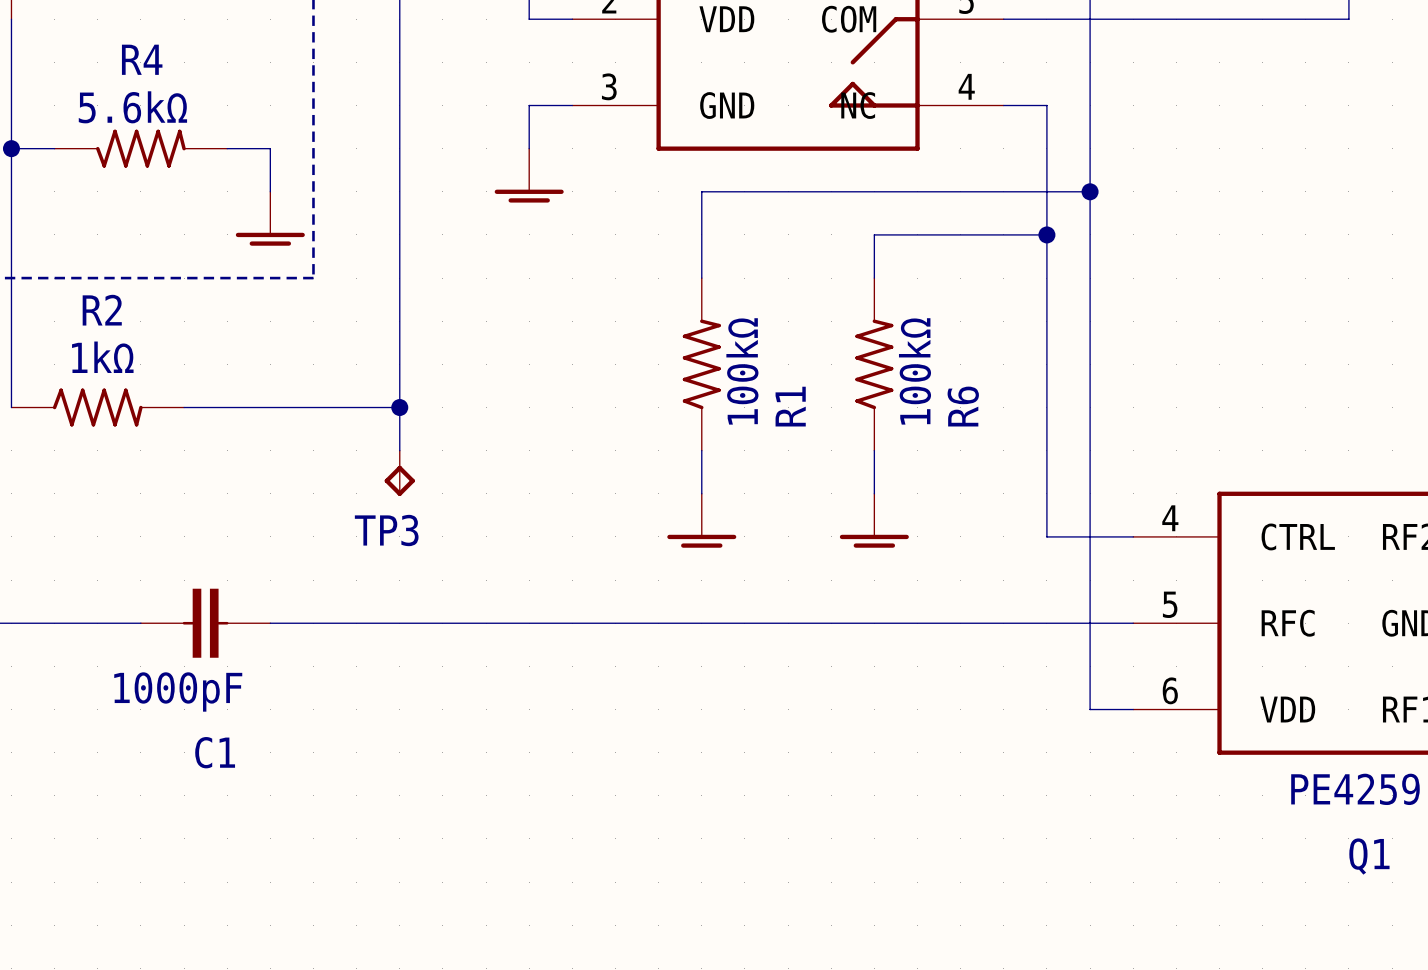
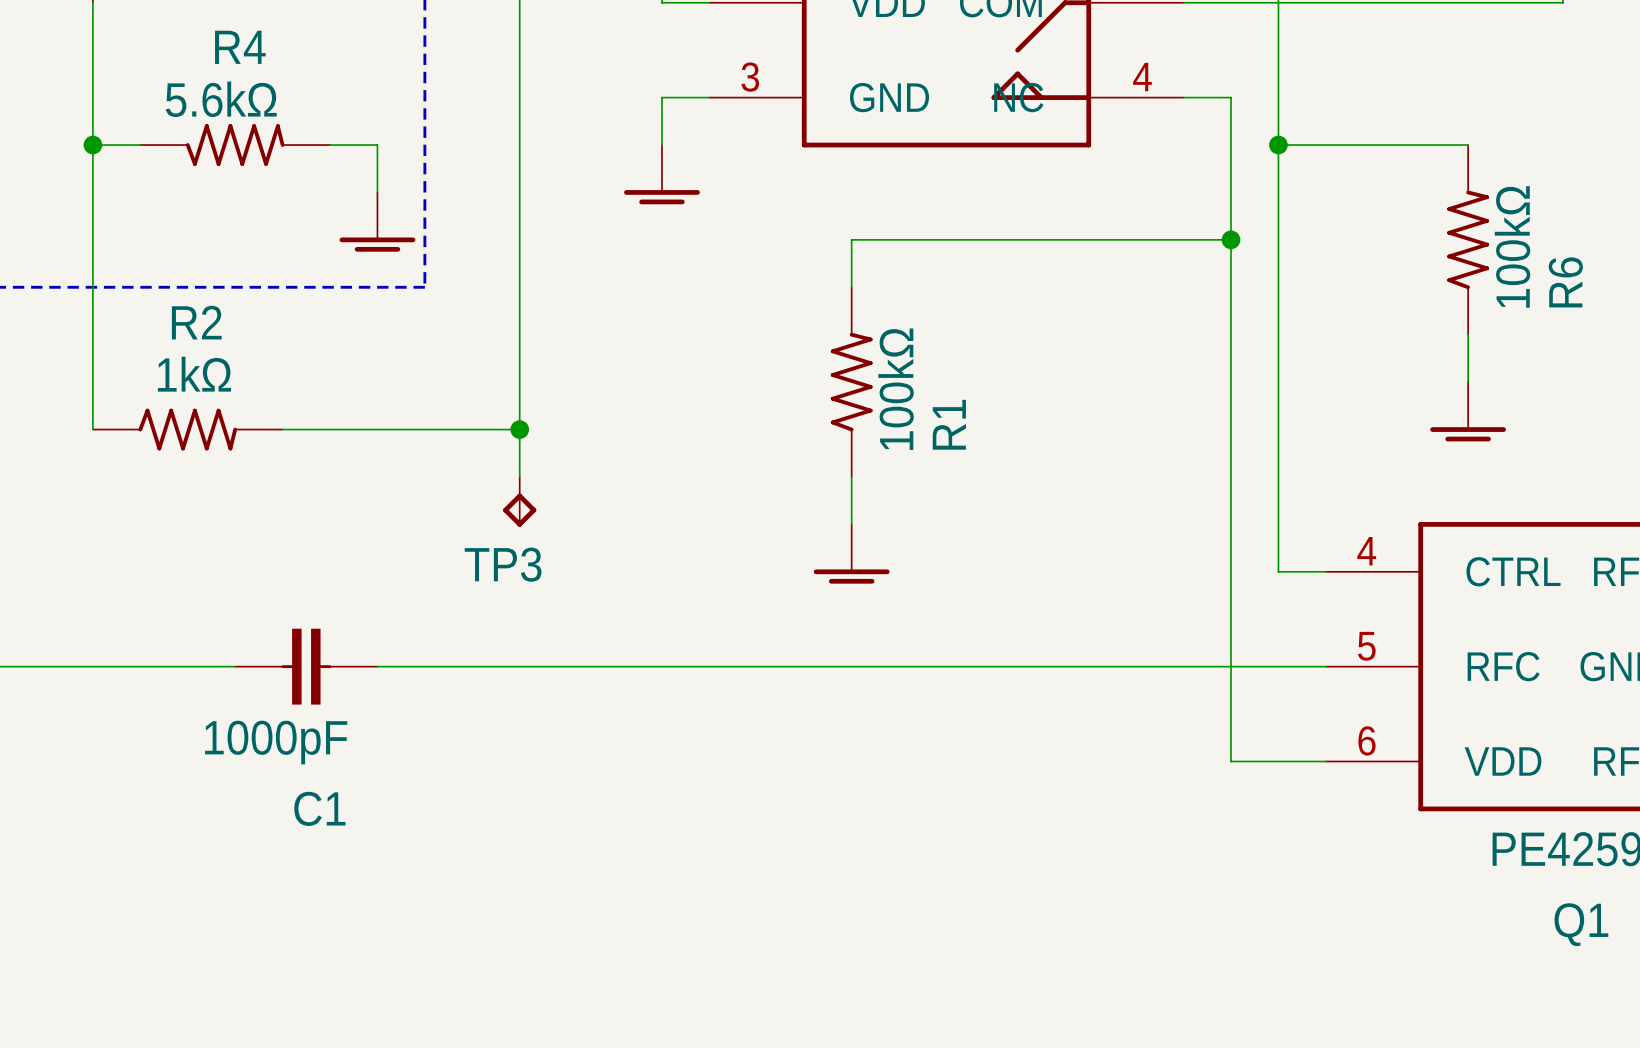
wire: none -> (1278, 145) (1468, 145)
wire: (1090, 191) (701, 191) (701, 234) -> none
junction position: (1090, 191) -> (1278, 145)
wire: (874, 234) (874, 278) -> (1041, 239) (851, 239)
R6 position: (874, 364) -> (1468, 239)
wire: (874, 450) (874, 493) -> (1468, 334) (1468, 382)
power symbol position: (874, 520) -> (1468, 411)
wire: (1046, 536) (1090, 536) (1090, 709) -> (1231, 571) (1231, 761) (1278, 761)

